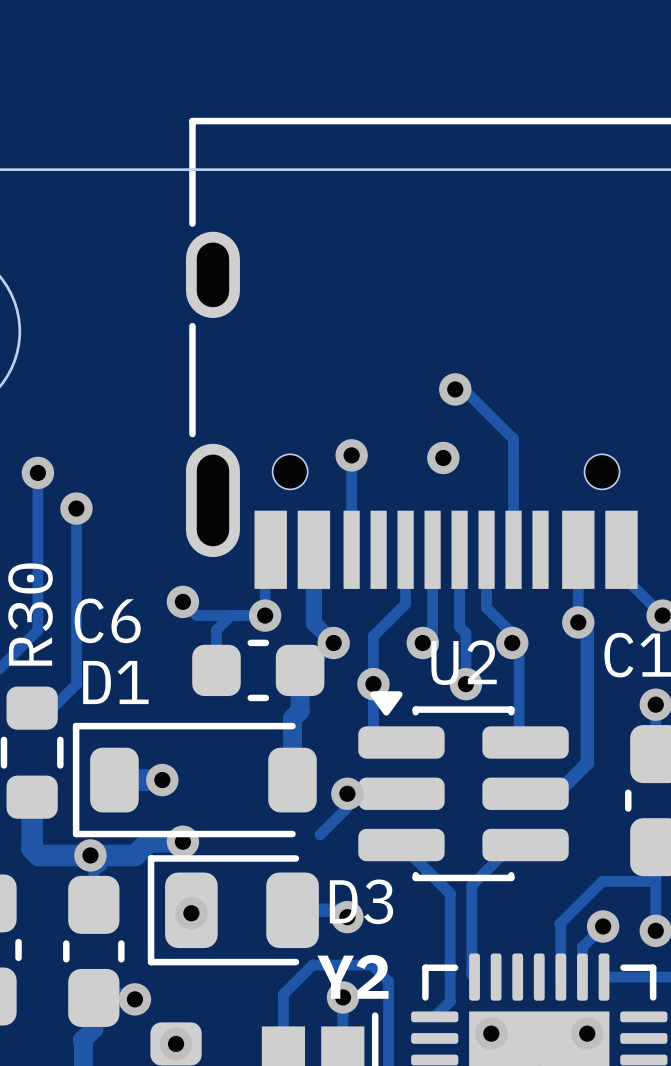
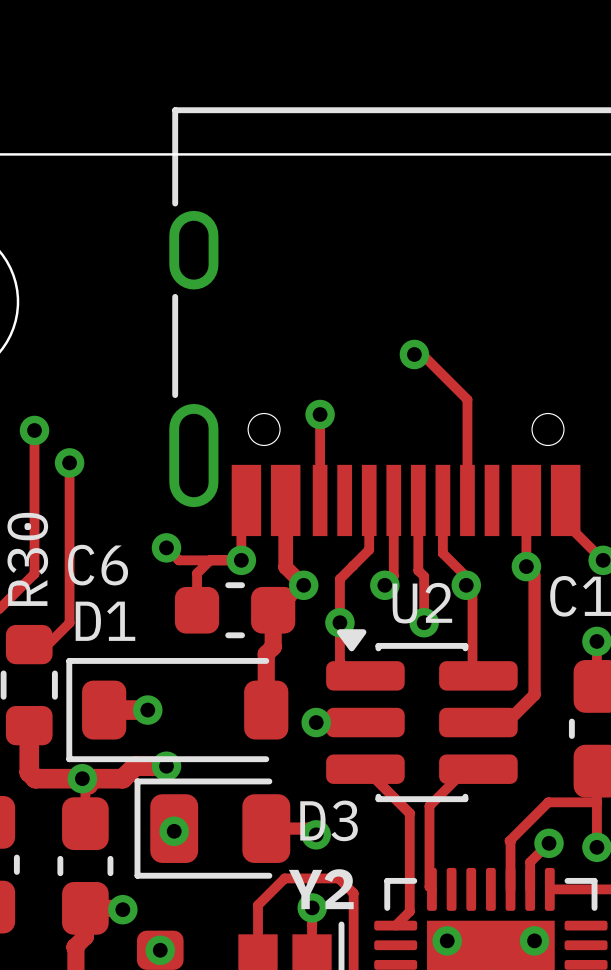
via: (443, 457) -> none
track: (347, 793) (347, 807) (319, 834) -> none

